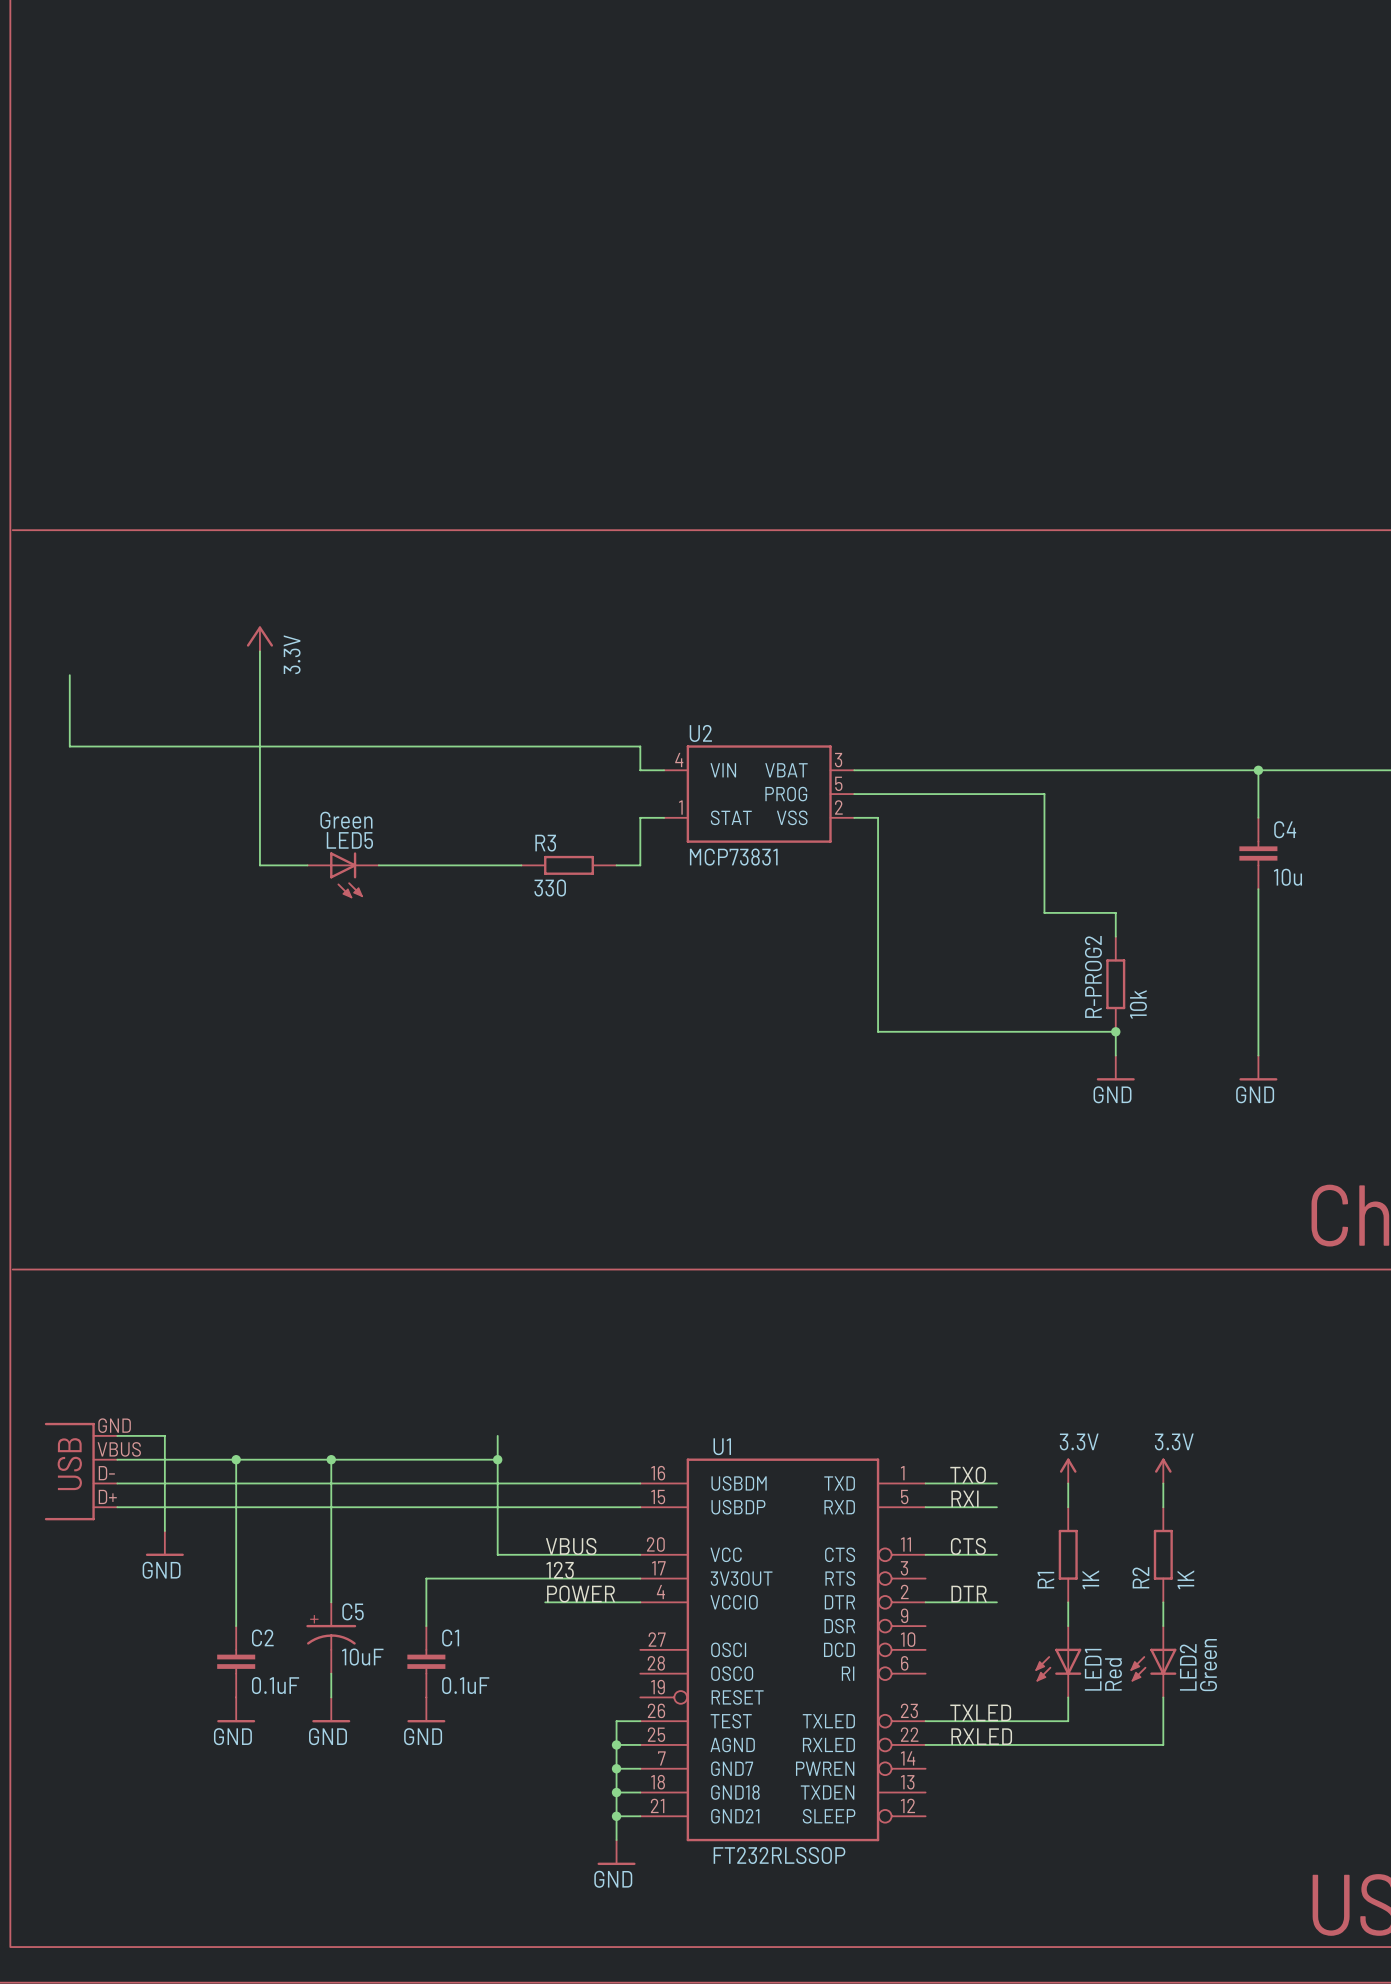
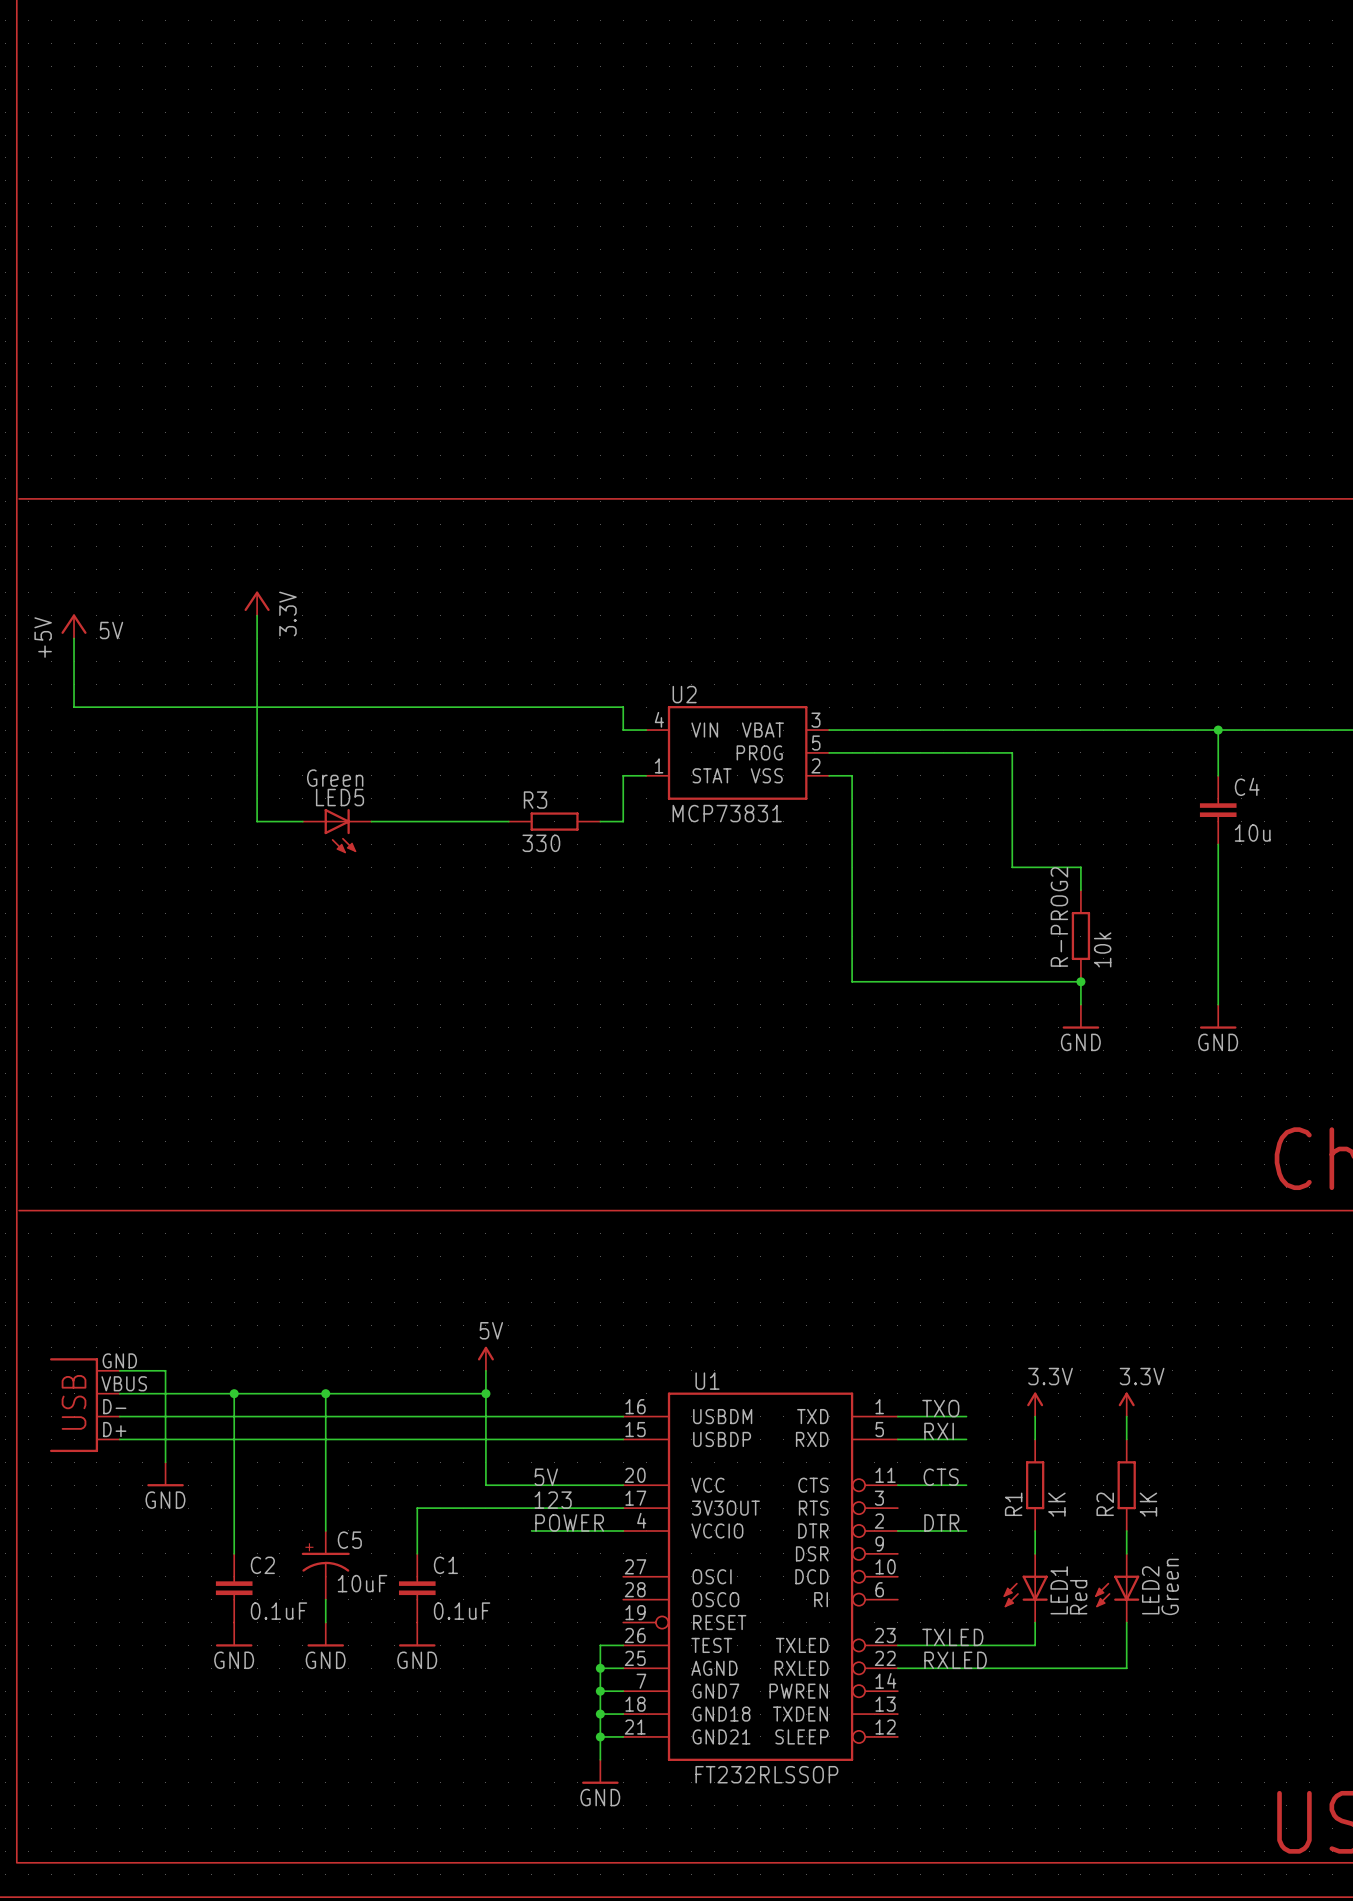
power symbol: none -> +5V (74, 626)
label: none -> 5V (111, 630)
power symbol: none -> 5V (485, 1358)
label: VBUS (571, 1546) -> 5V (546, 1477)

